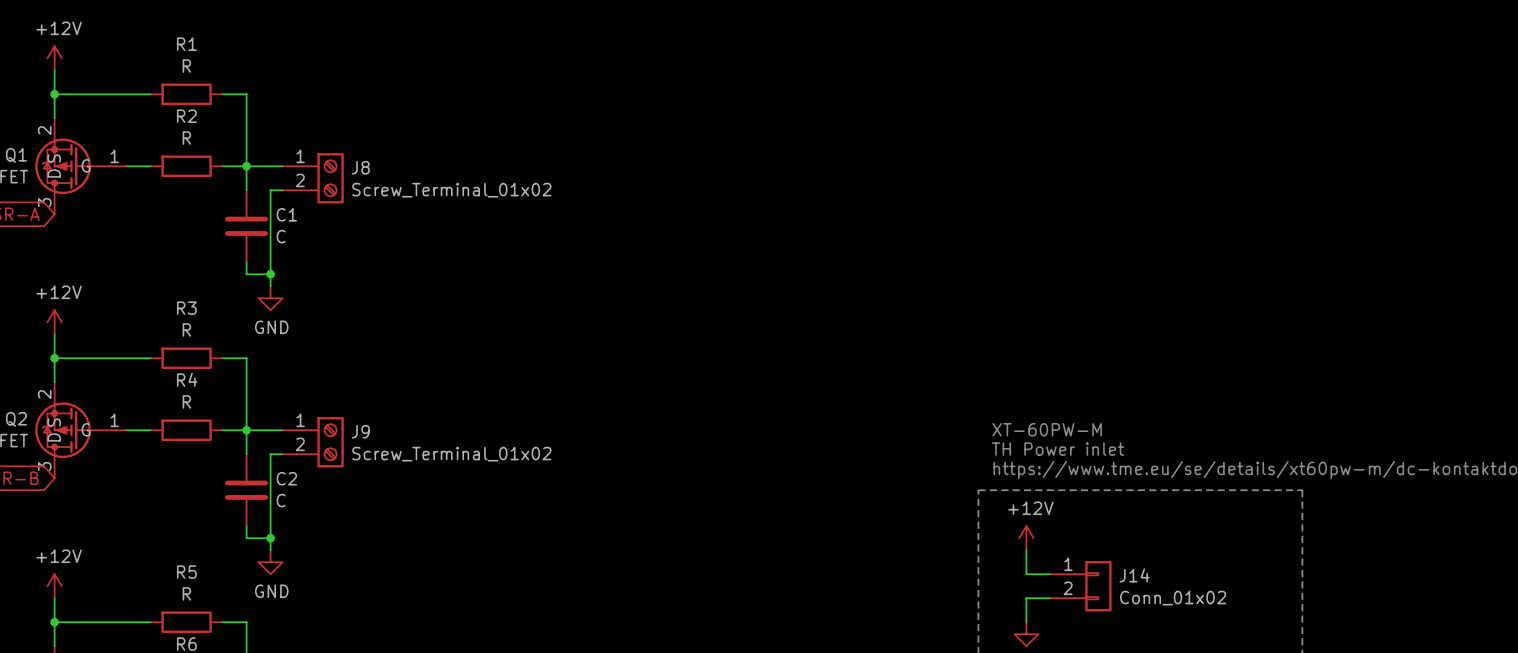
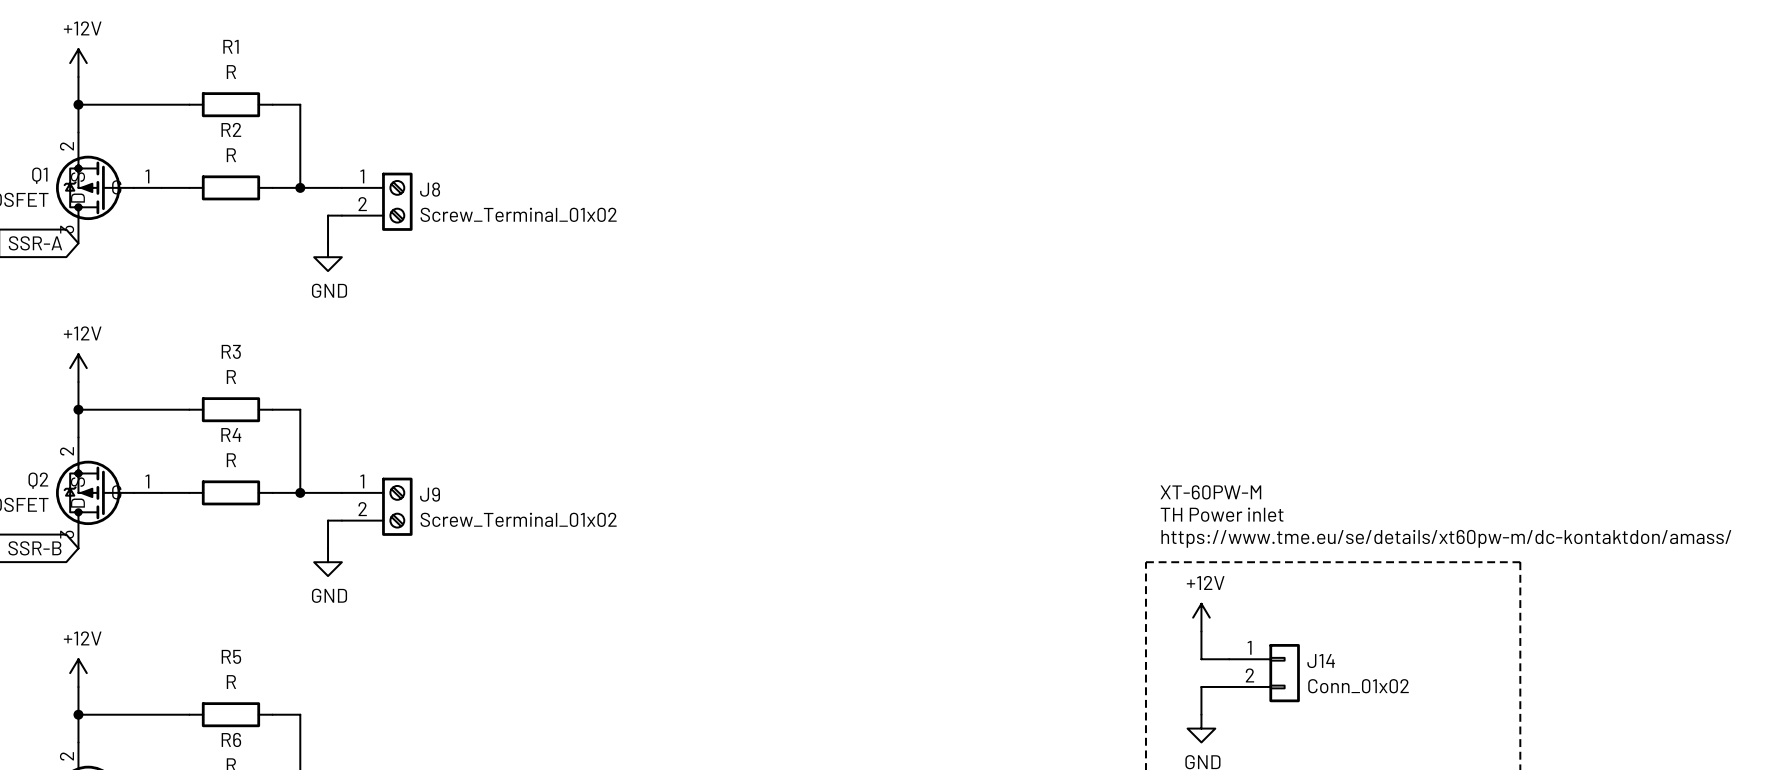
wire: (246, 166) (246, 190) -> none
wire: (270, 214) (270, 286) -> none
C1: C (246, 226) -> none
wire: (246, 262) (246, 274) (270, 274) -> none
junction: (270, 274) -> none
power symbol position: GND (270, 298) -> GND (328, 257)
wire: (246, 430) (246, 454) -> none
wire: (270, 478) (270, 550) -> none
C2: C (246, 490) -> none
wire: (246, 526) (246, 538) (270, 538) -> none
junction: (270, 538) -> none
power symbol position: GND (270, 562) -> GND (328, 562)

